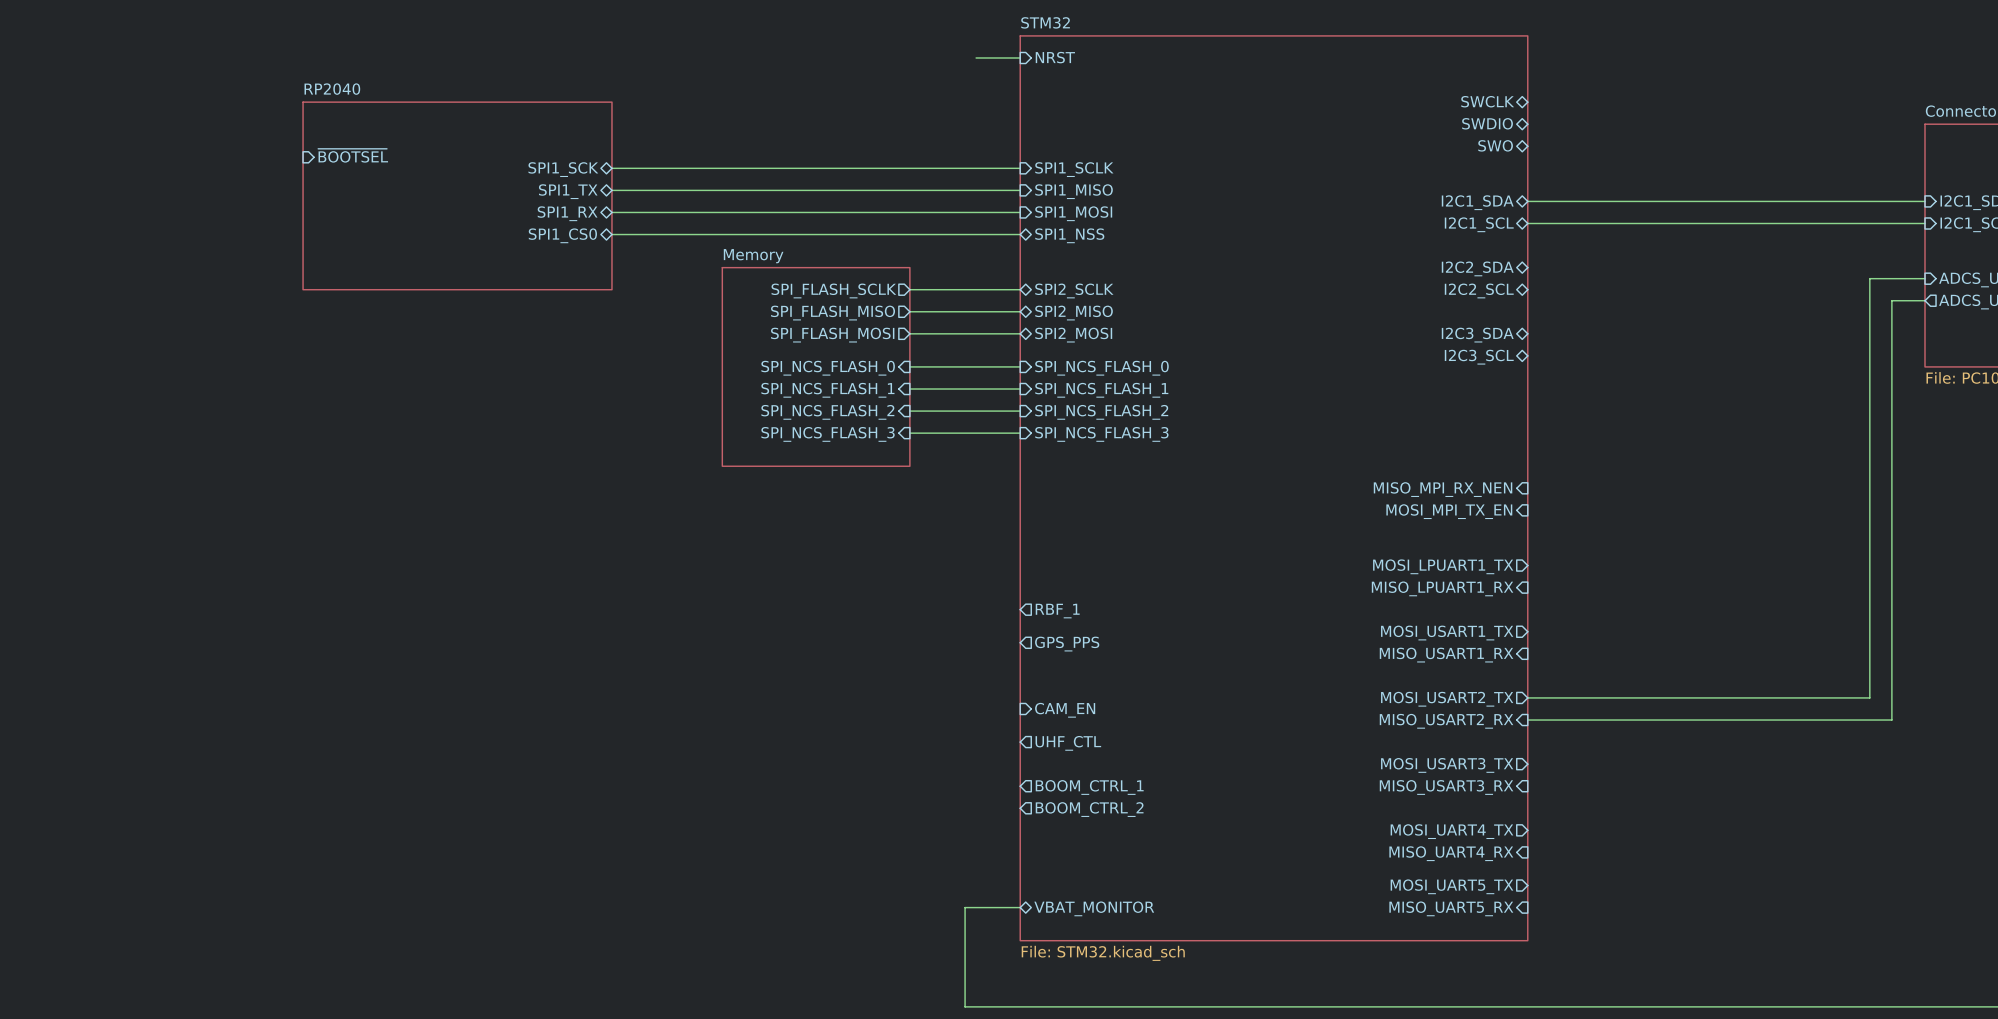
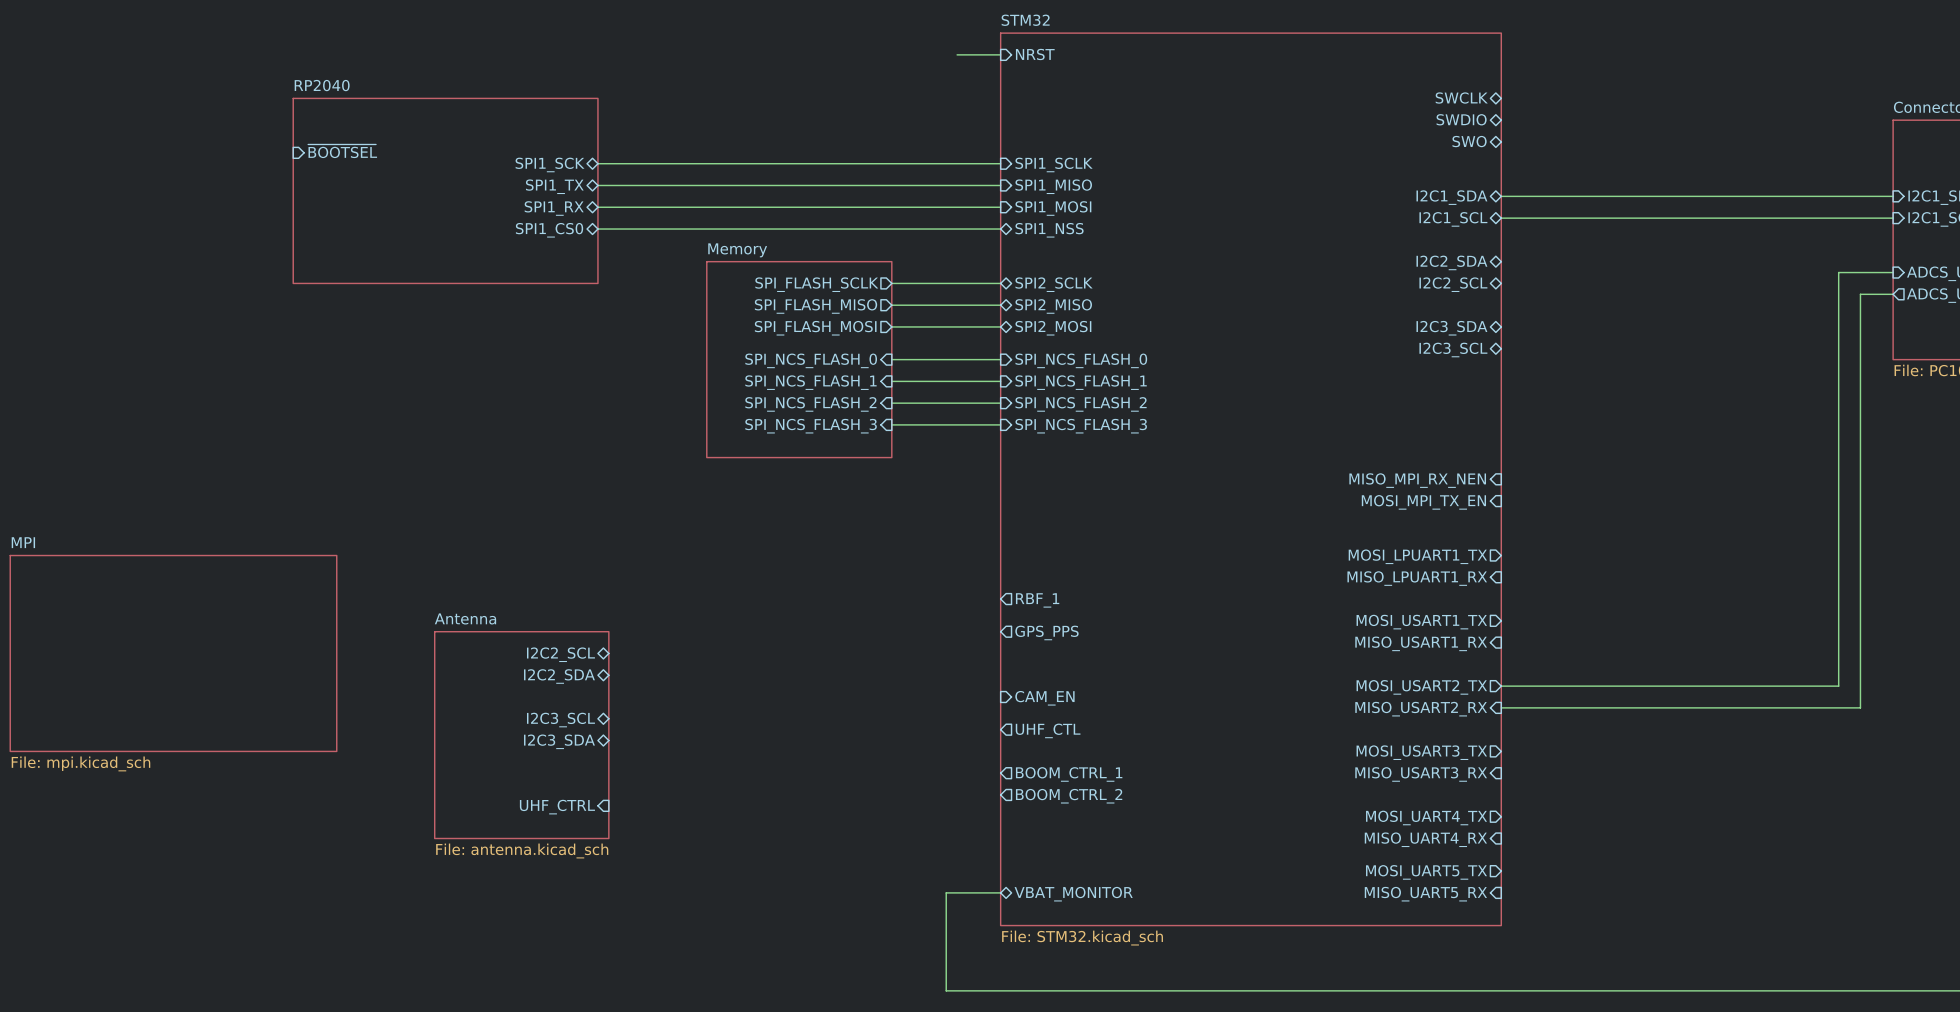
sheet MPI: none -> File: mpi.kicad_sch (173, 653)
sheet pin: none -> I2C2_SCL (560, 654)
sheet pin: none -> I2C2_SDA (559, 676)
sheet pin: none -> I2C3_SCL (560, 720)
sheet Antenna: none -> File: antenna.kicad_sch (521, 735)
sheet pin: none -> I2C3_SDA (559, 741)
sheet pin: none -> UHF_CTRL (557, 807)

